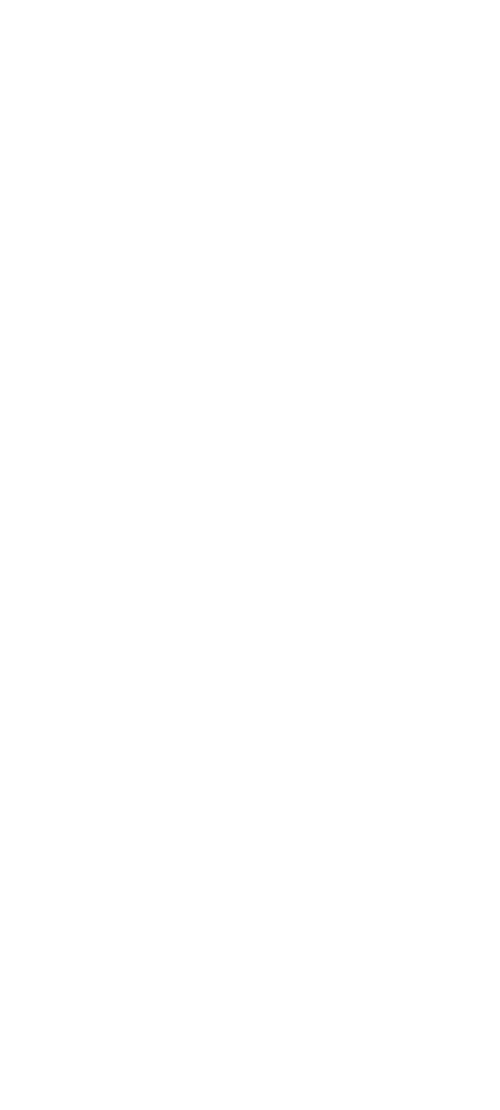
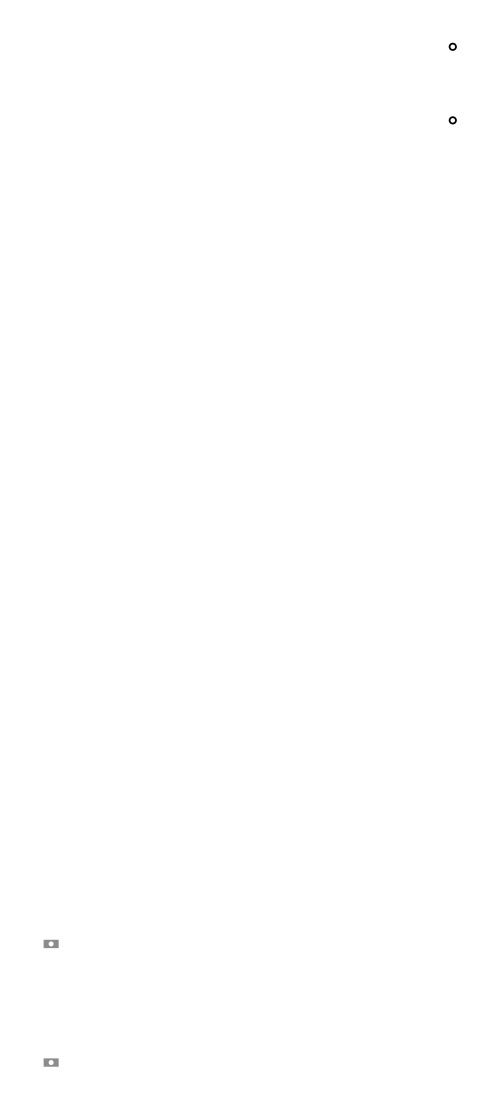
part: none -> (452, 46)
part: none -> (452, 120)
part: none -> (51, 943)
part: none -> (51, 1062)

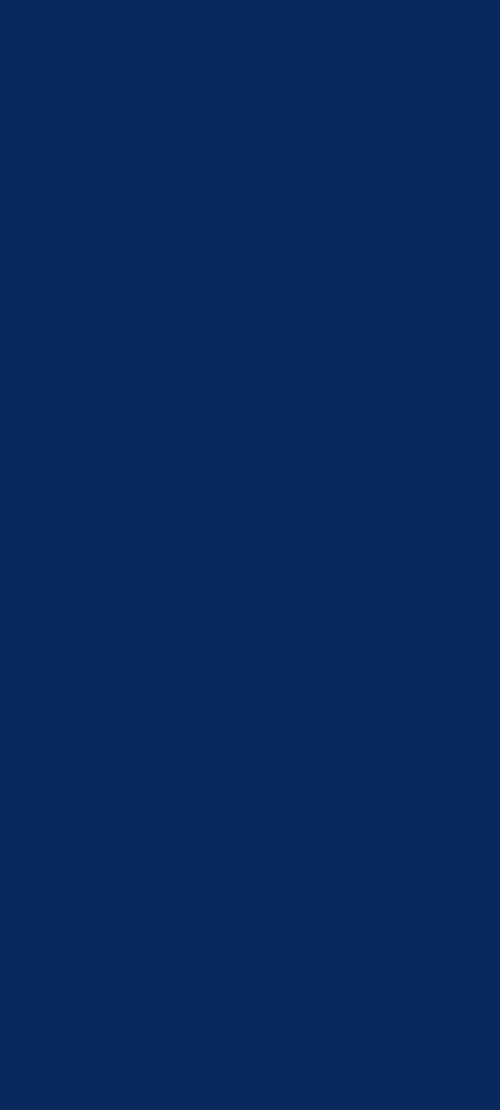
part: (452, 46) -> none
part: (452, 120) -> none
part: (51, 943) -> none
part: (51, 1062) -> none

